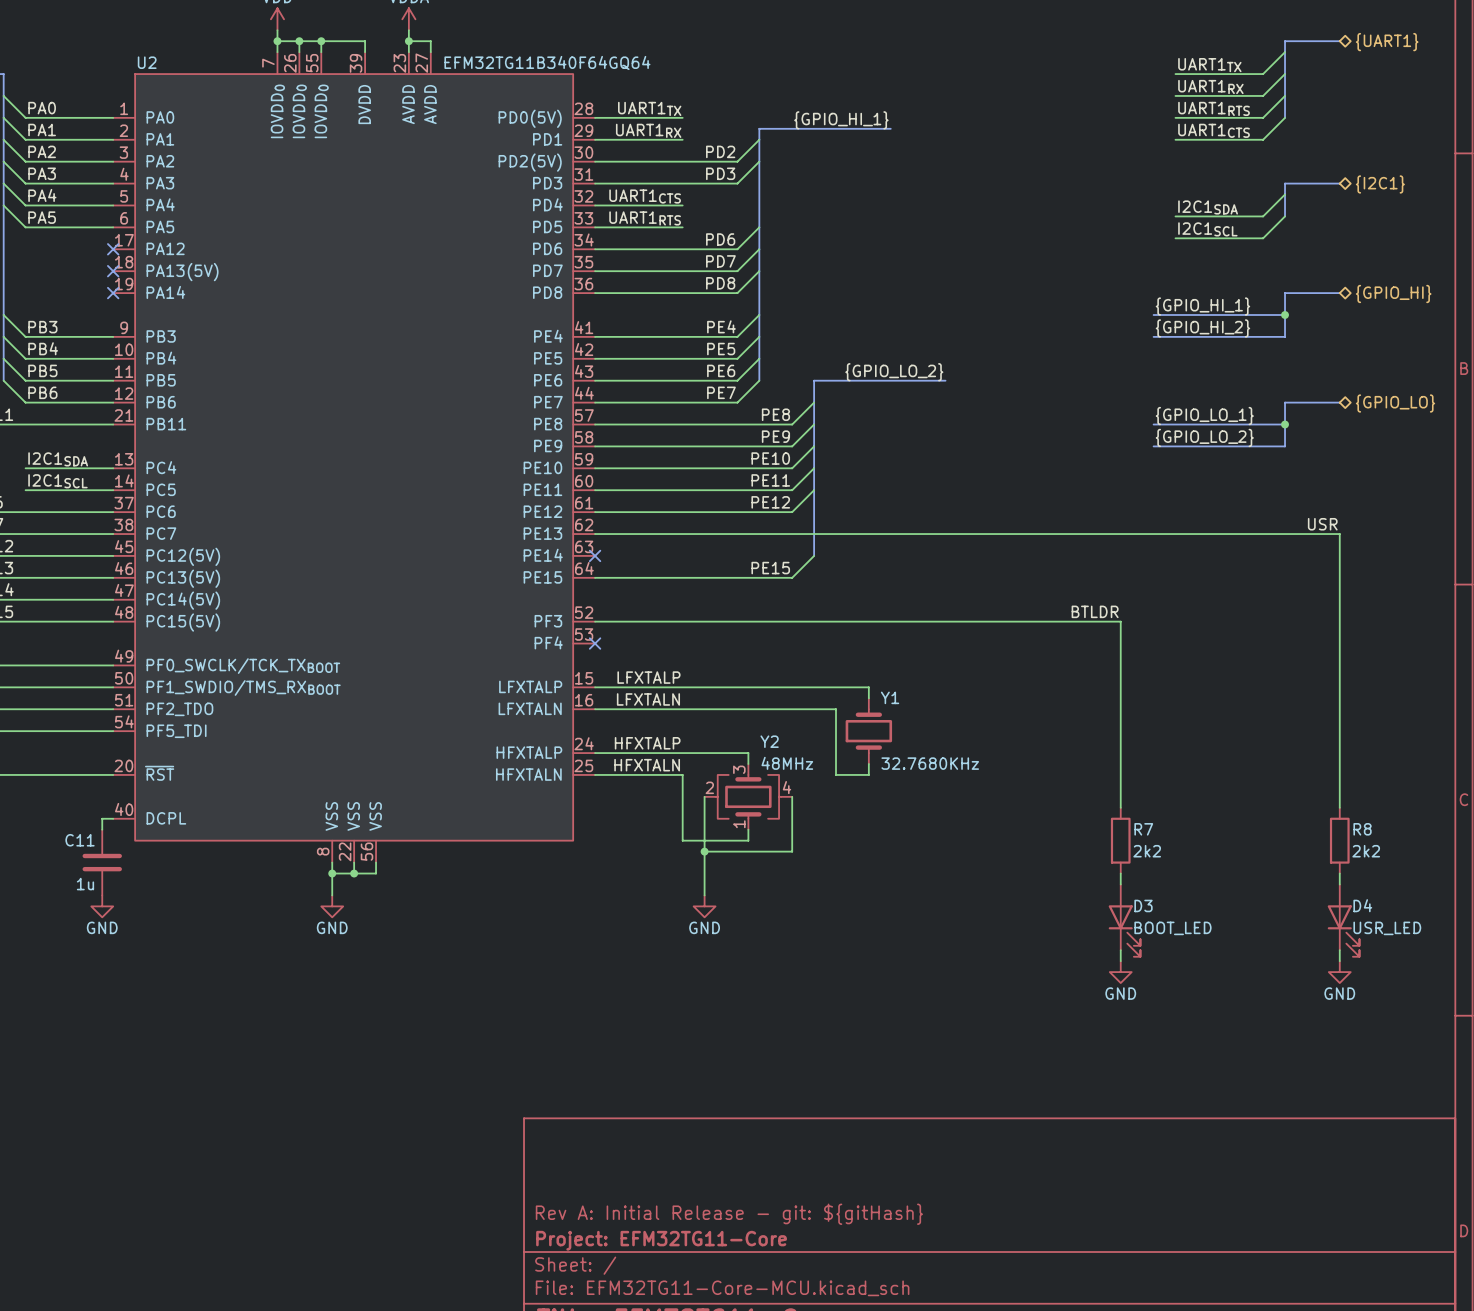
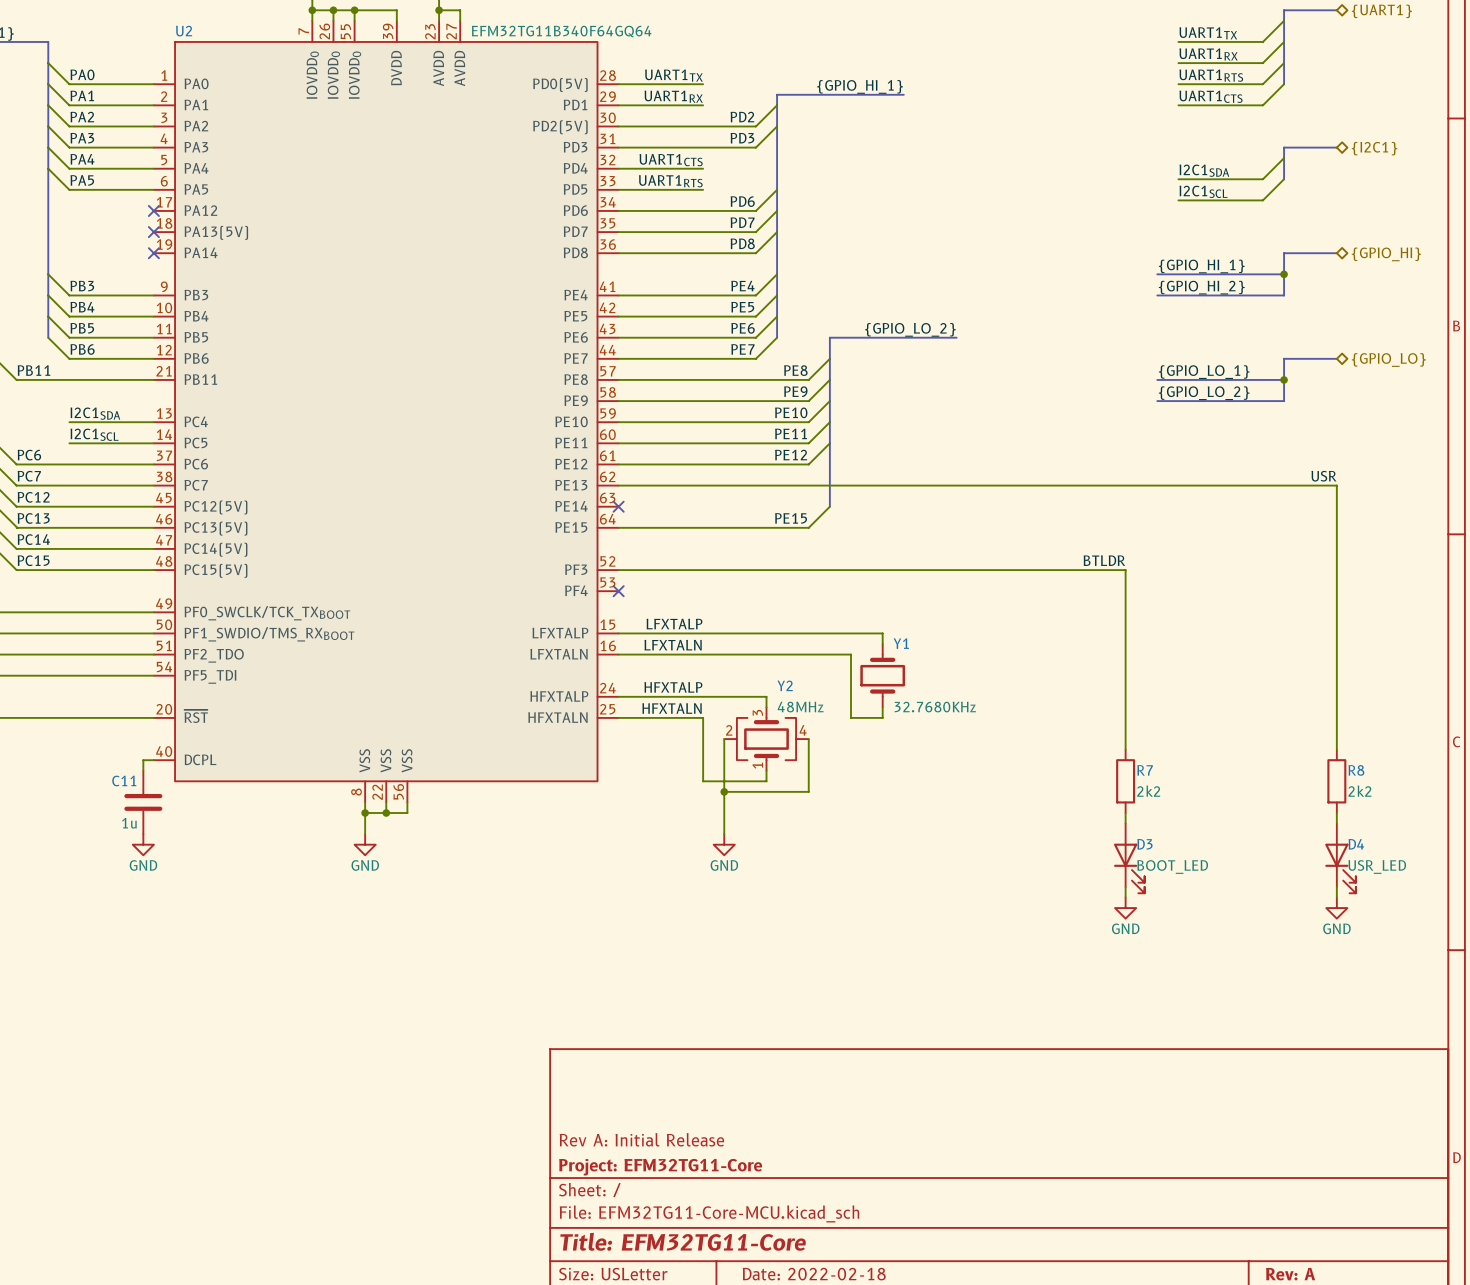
title block: Rev A: Initial Release - git: ${gitHash} (729, 1214) -> Rev A: Initial Release (641, 1139)

